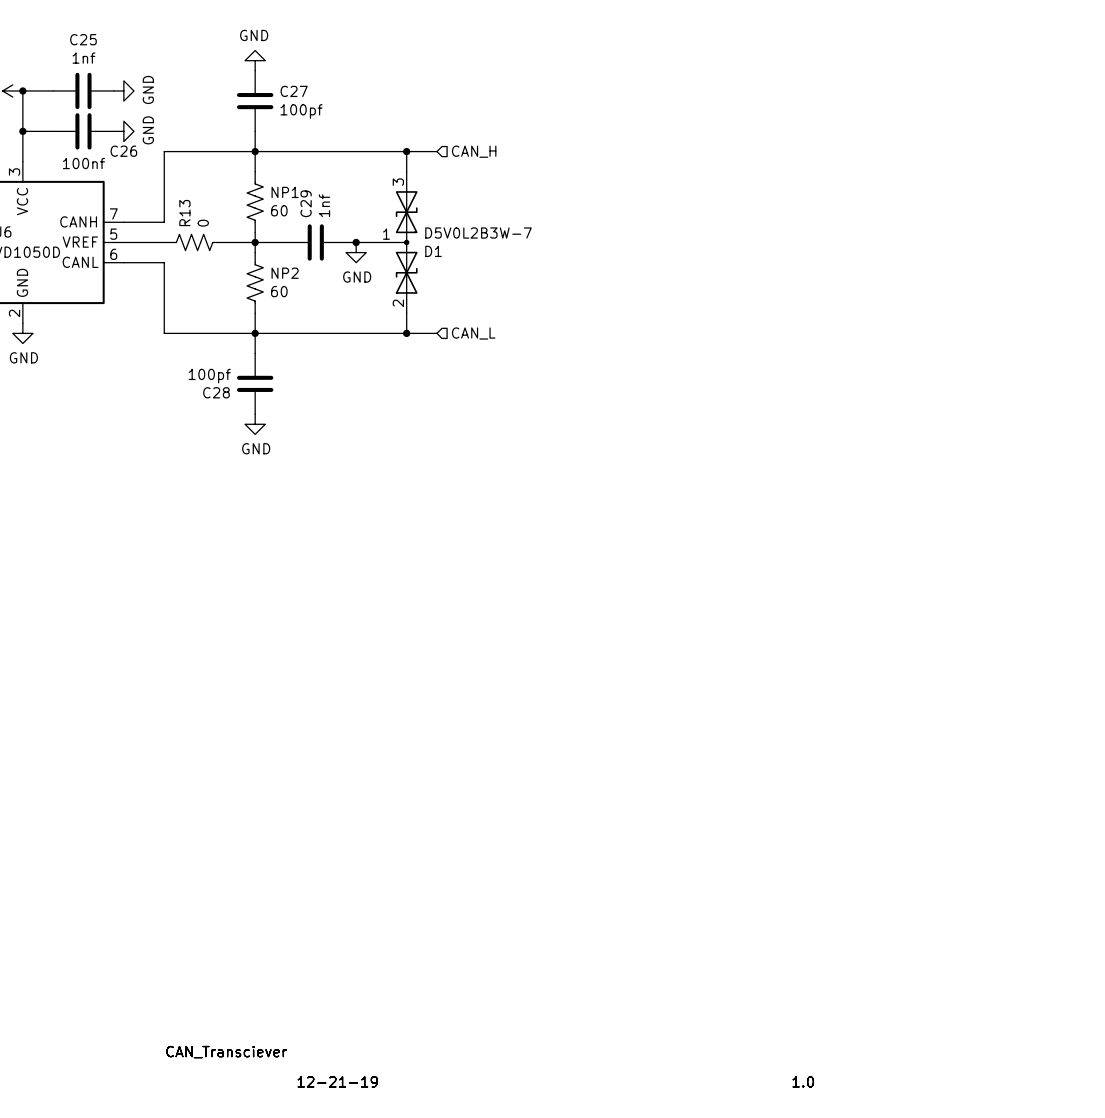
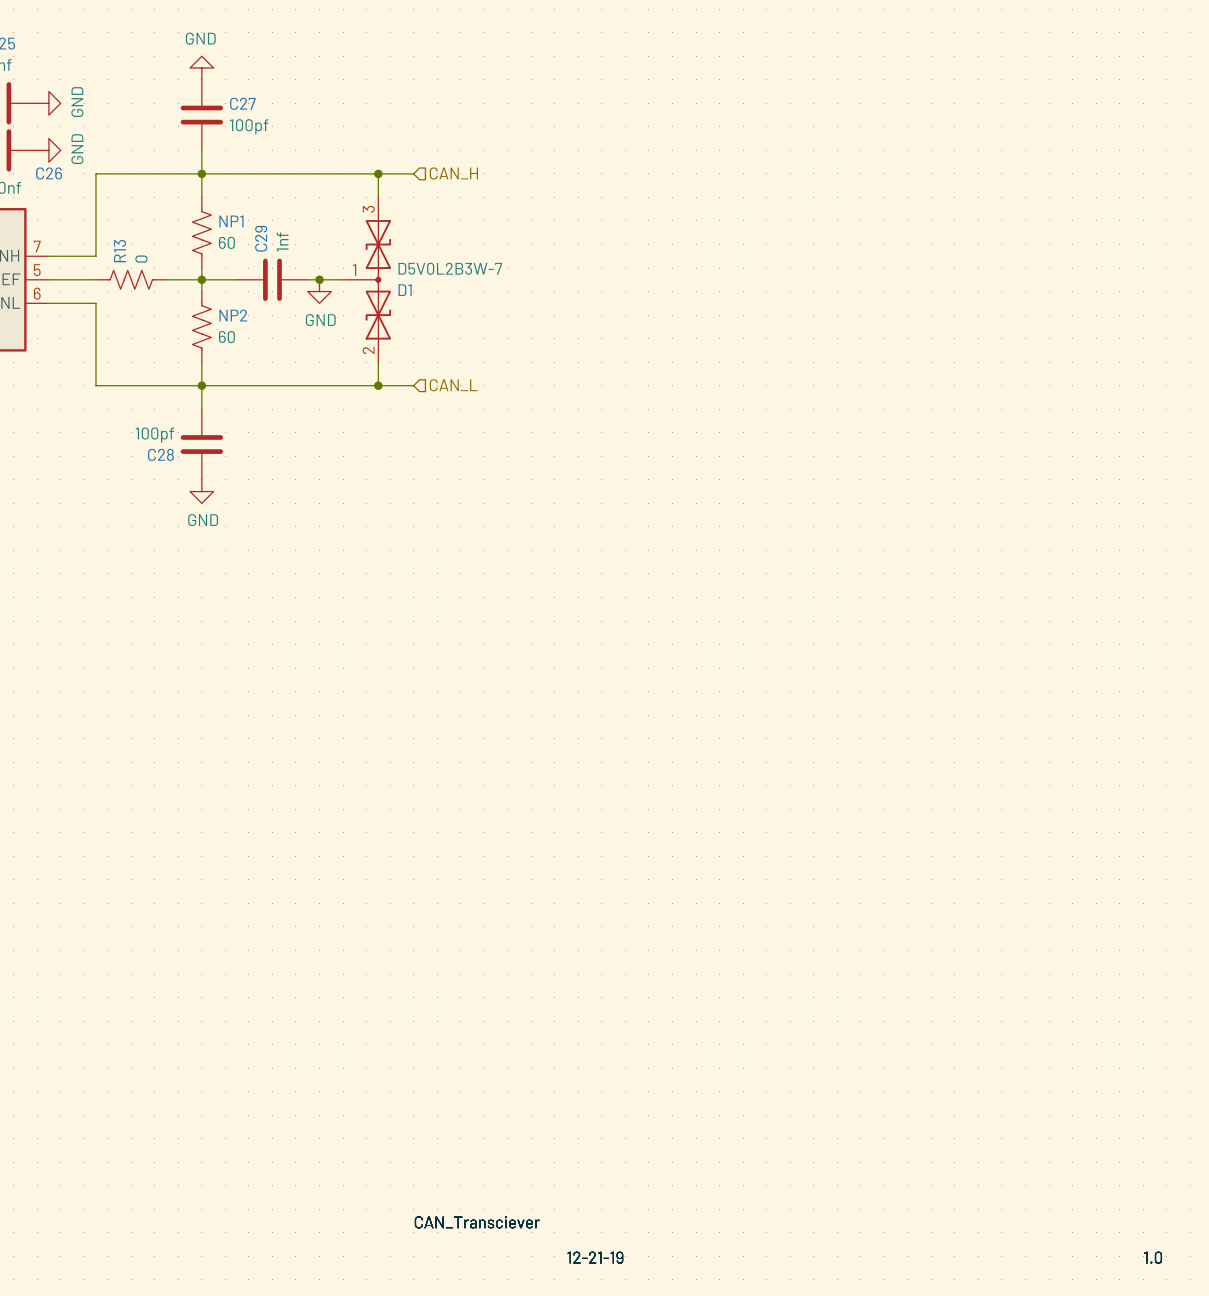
label: CAN_Transciever (226, 1052) -> none
label: none -> CAN_Transciever (477, 1222)
label: 12-21-19 (337, 1081) -> none
label: none -> 12-21-19 (595, 1257)
label: 1.0 (803, 1081) -> none
label: none -> 1.0 (1153, 1257)

